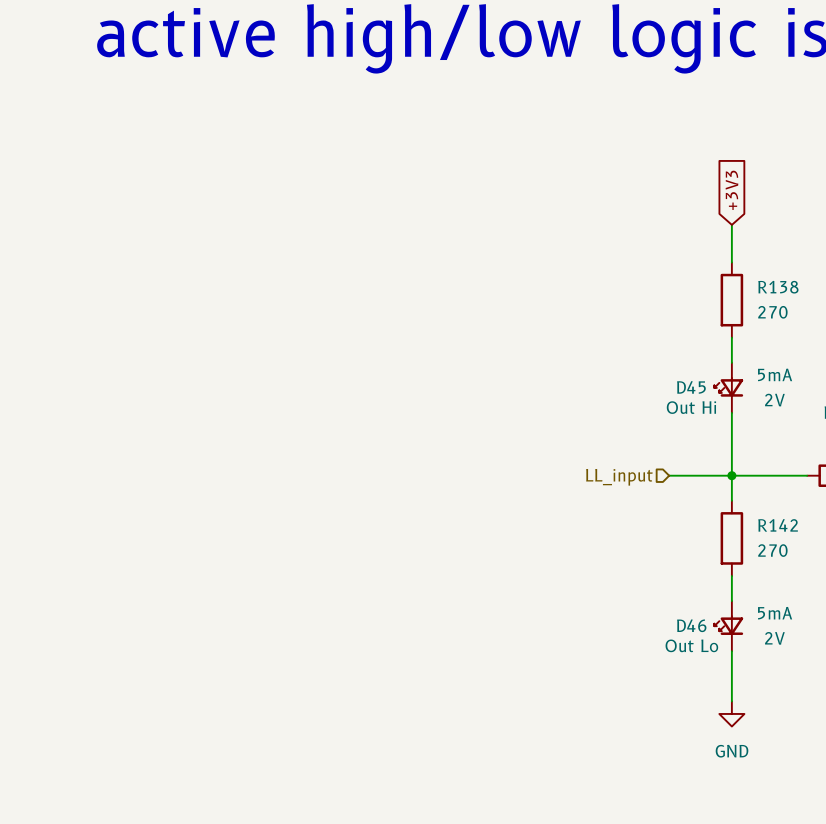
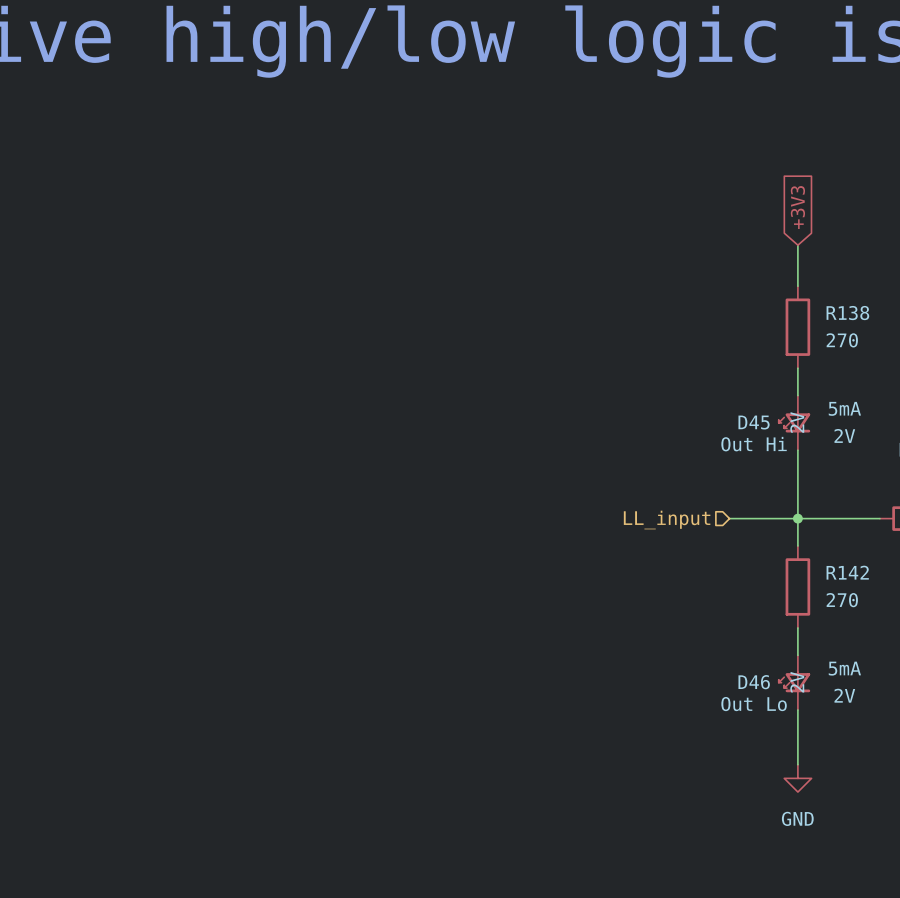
D45 text: none -> 2V (797, 422)
D46 text: none -> 2V (797, 682)

